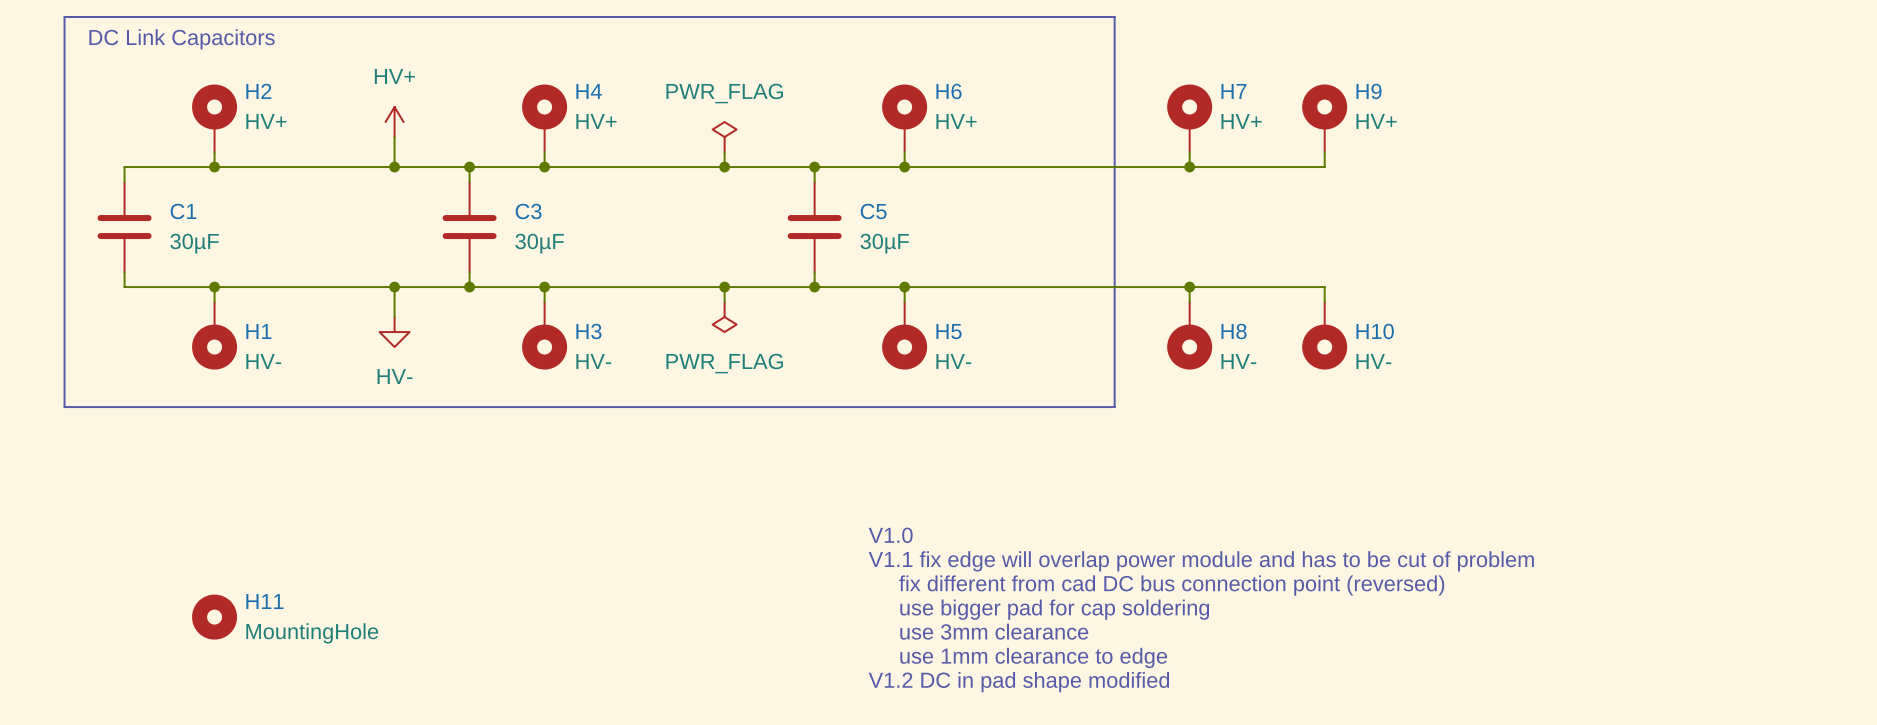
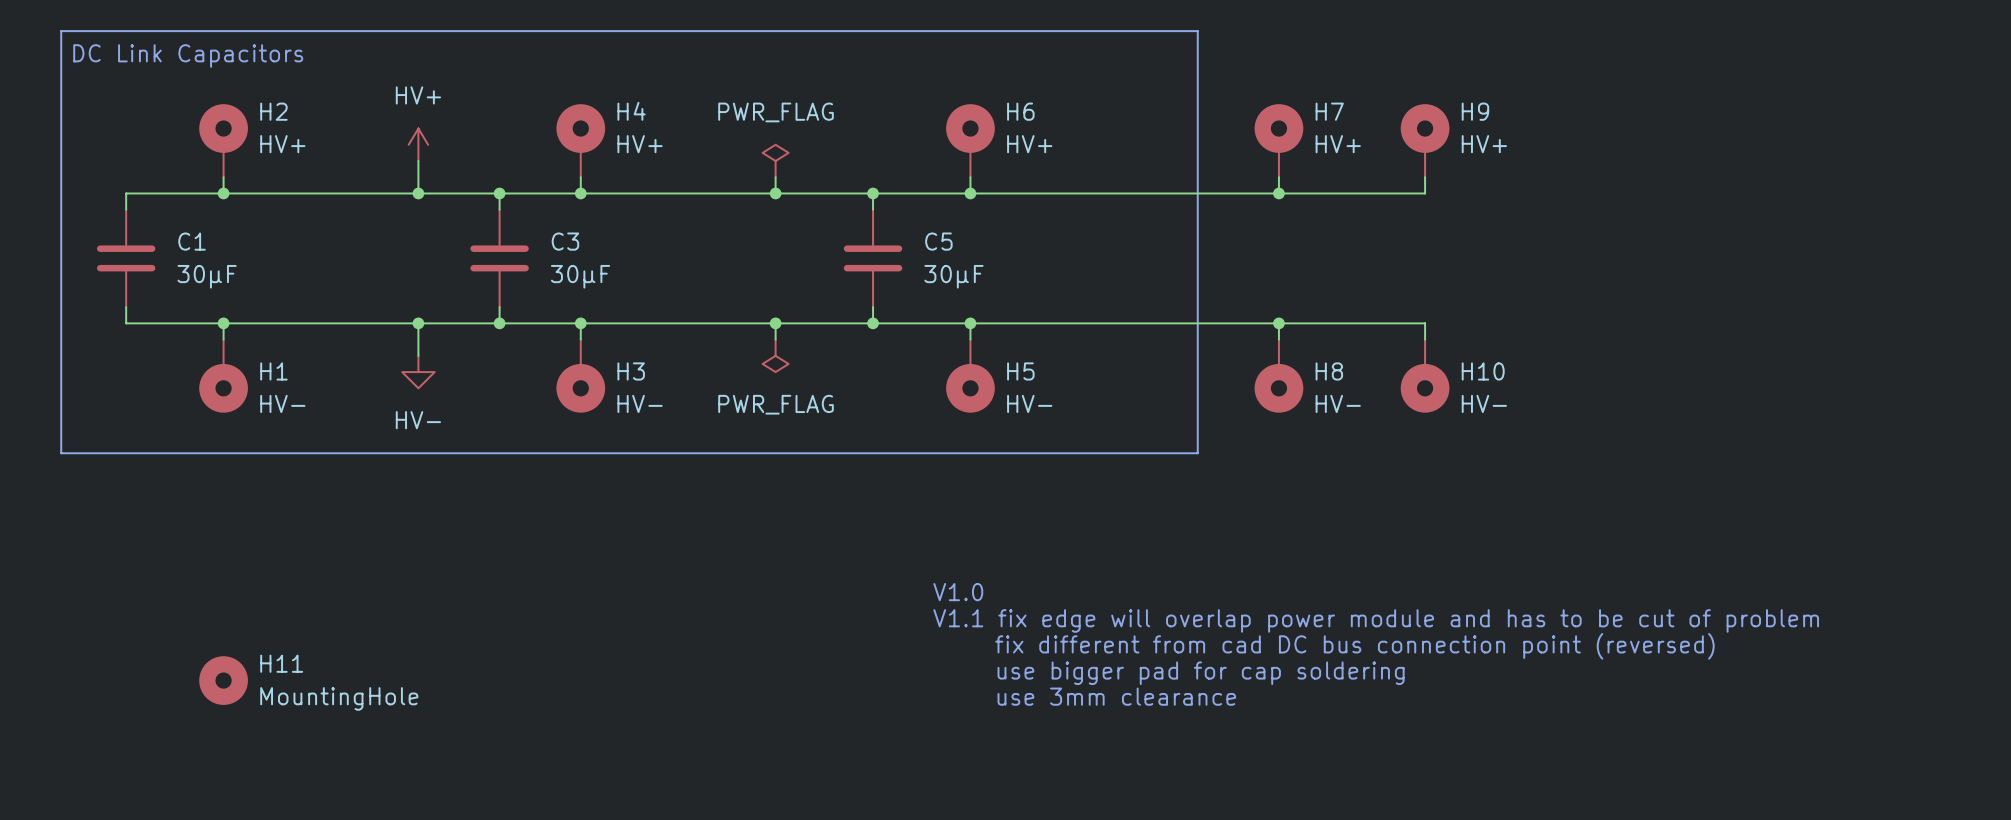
text: use 1mm clearance to edge (1033, 657) -> none
text: V1.2 DC in pad shape modified (1018, 682) -> none

